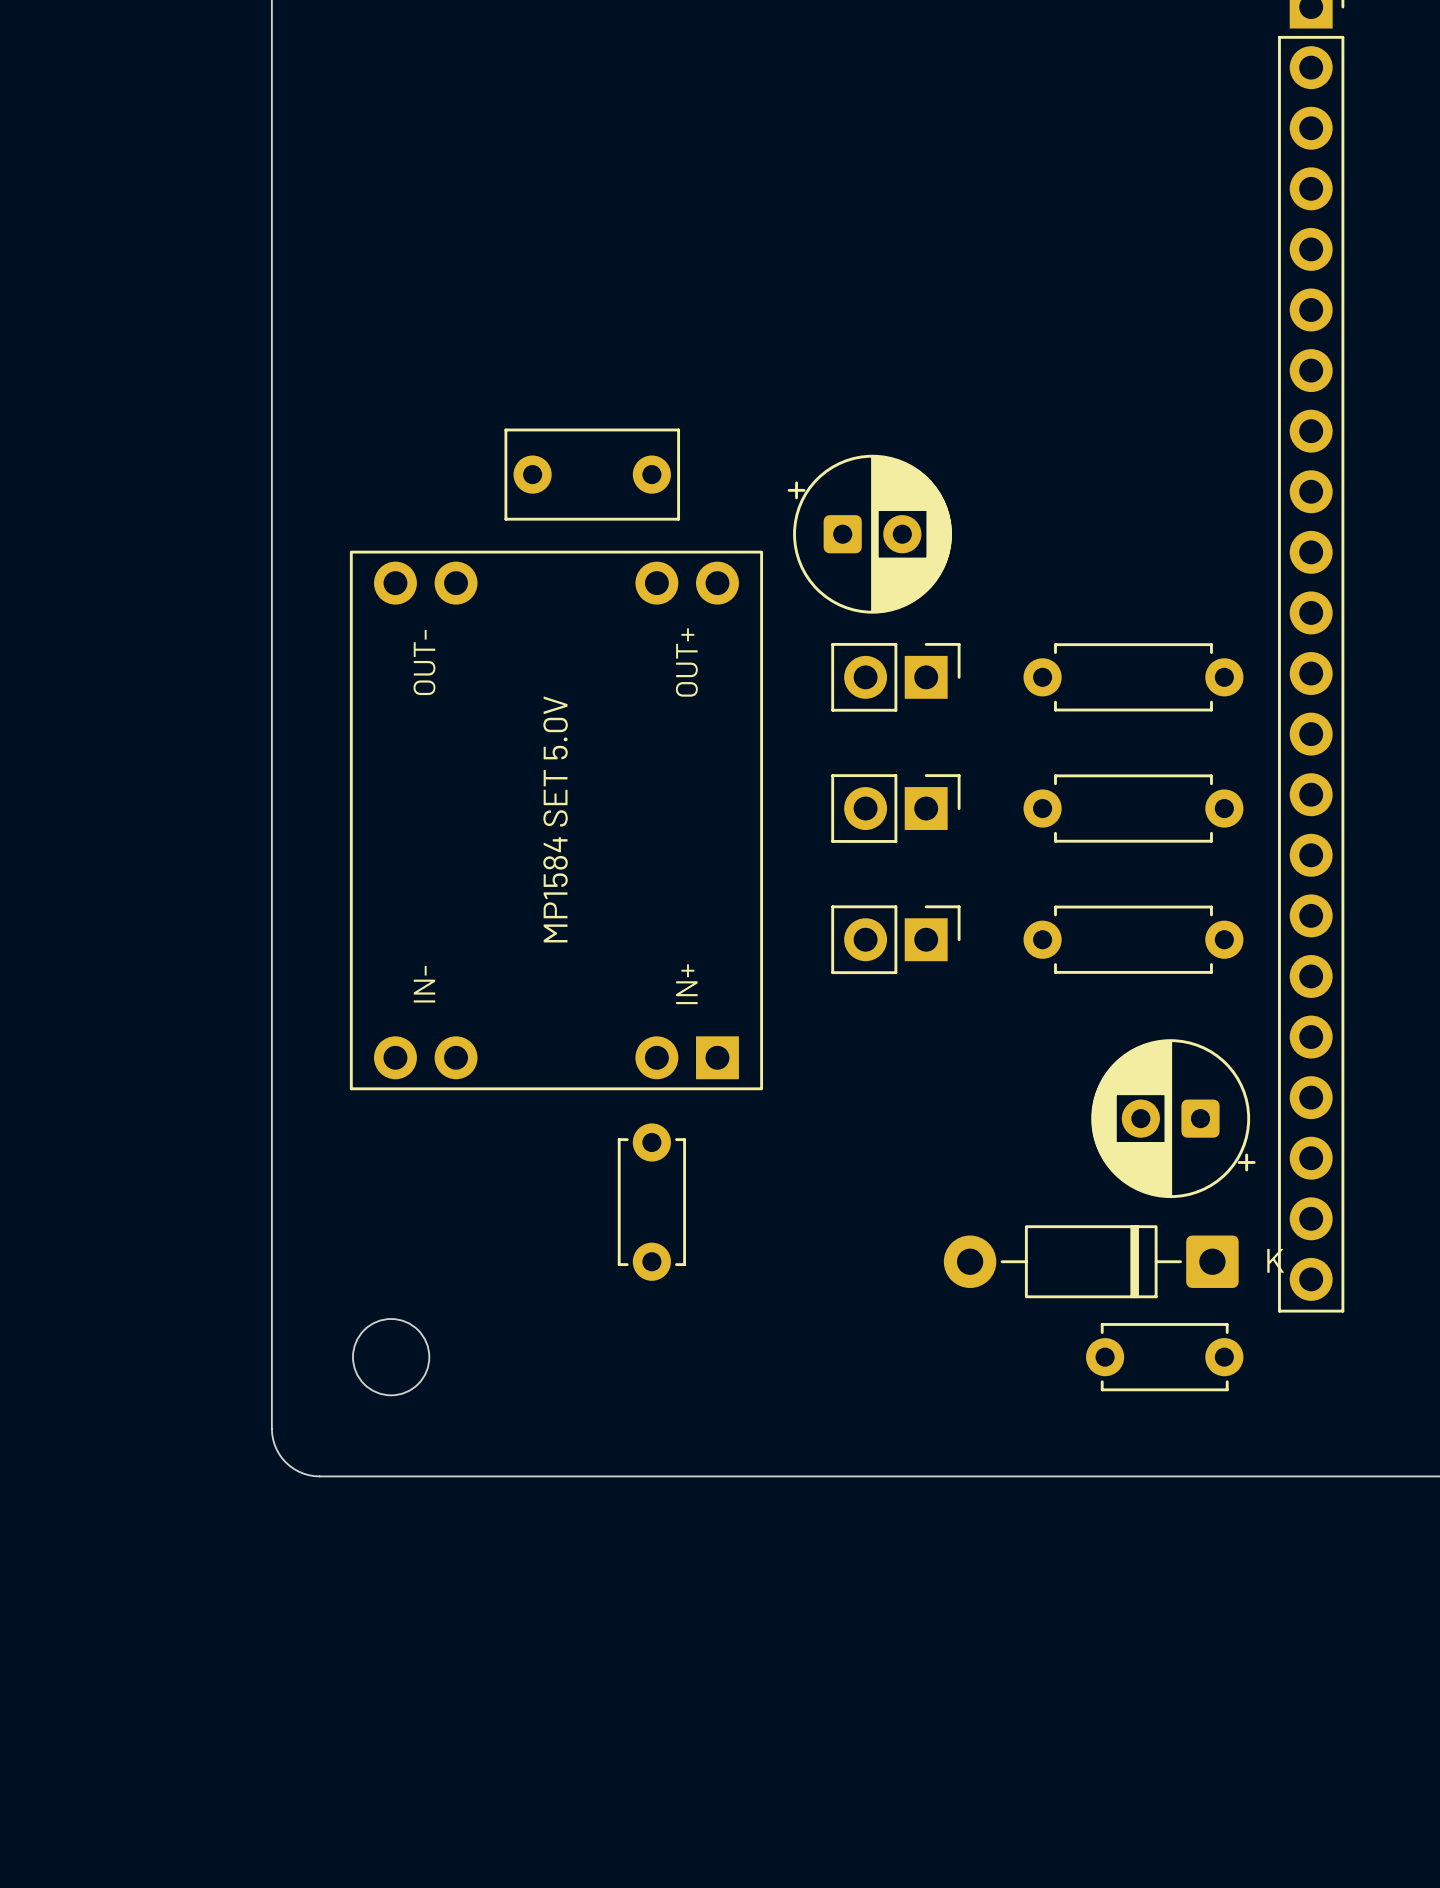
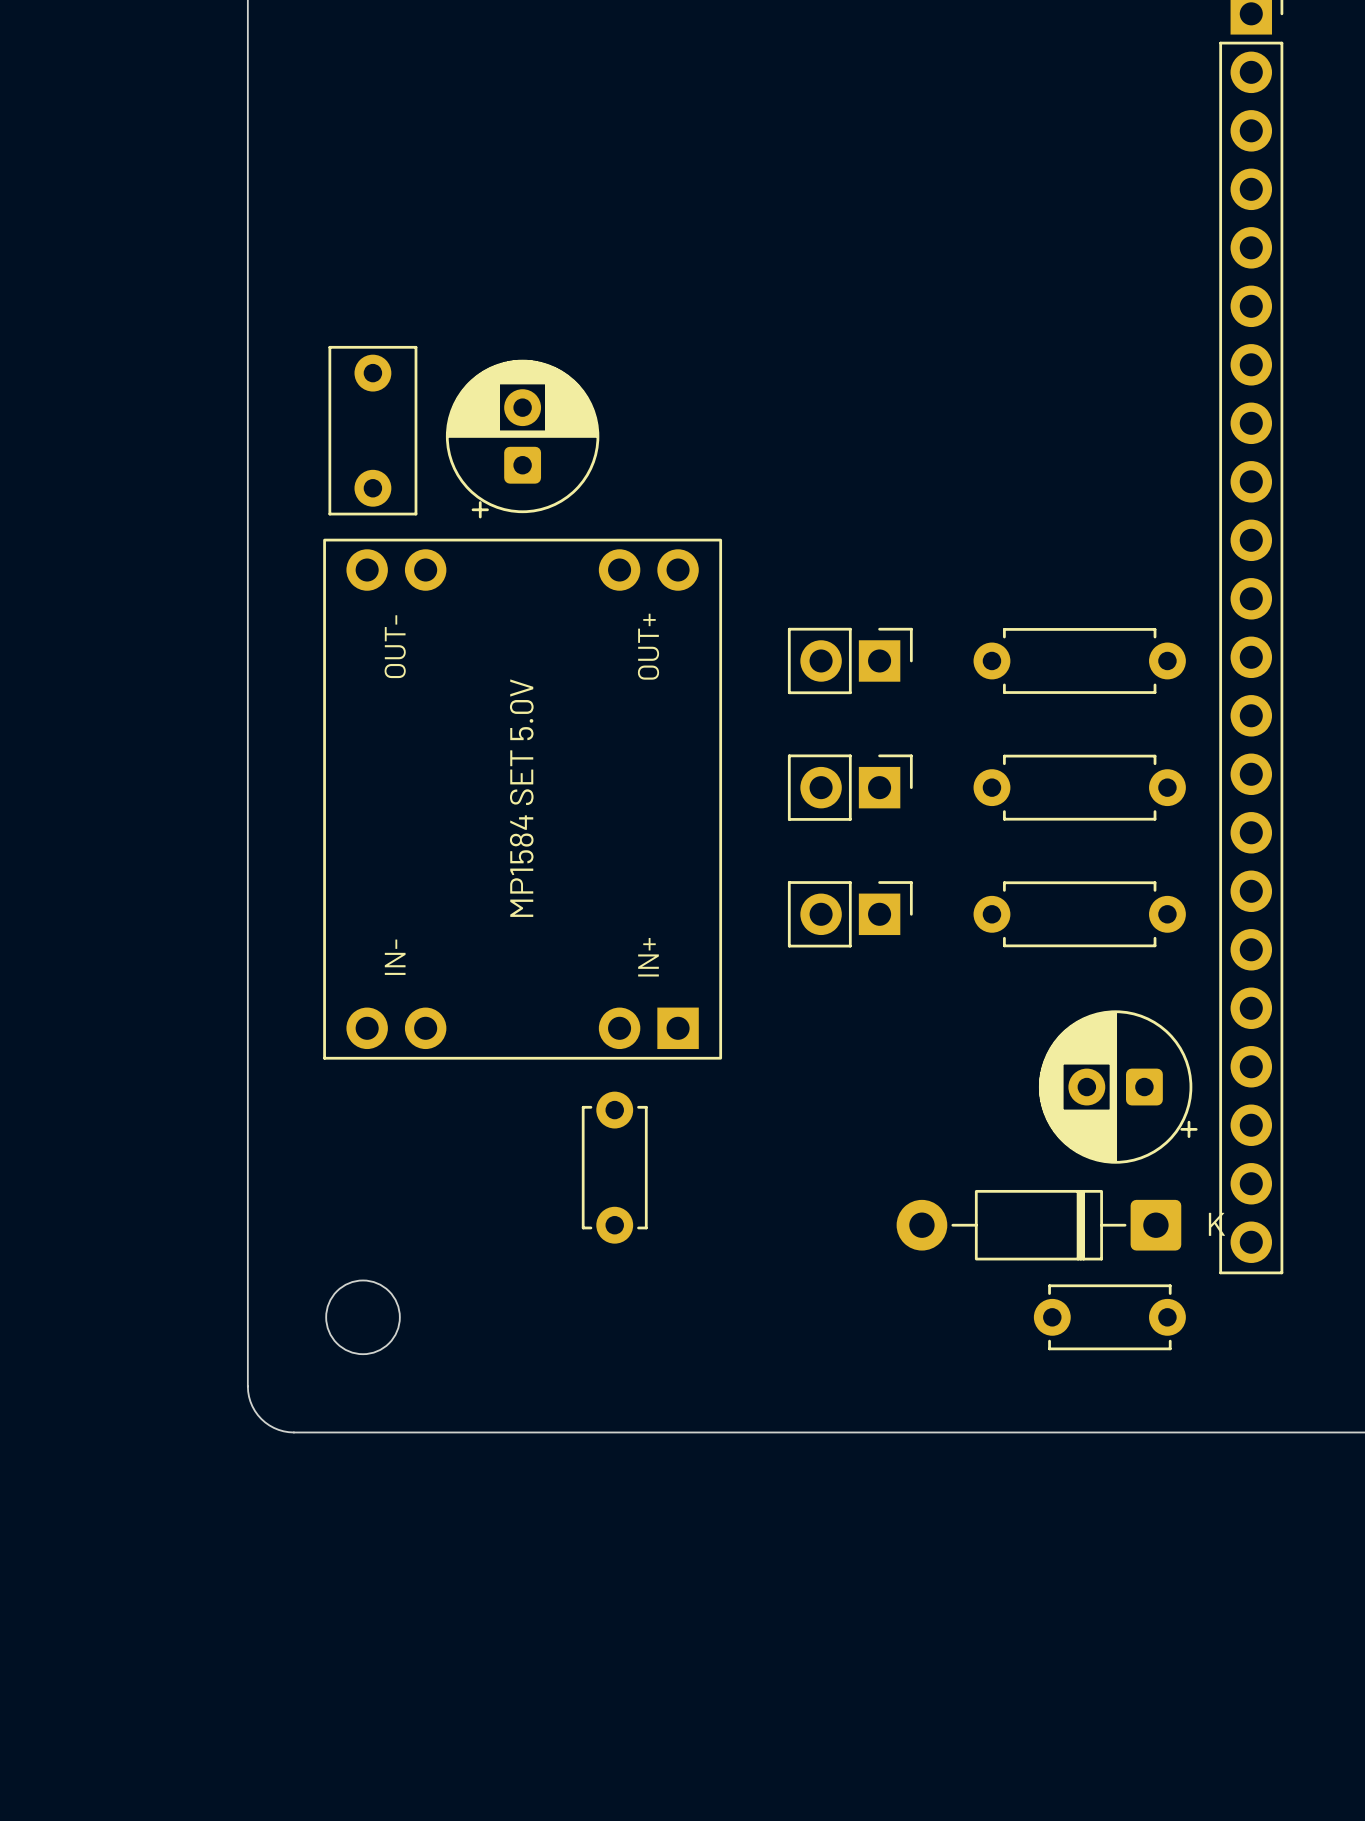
part rotation: 0° (592, 474) -> 90° clockwise (372, 430)
part position: (592, 474) -> (372, 430)
part rotation: 0° (869, 534) -> 90° counterclockwise (522, 439)
part position: (869, 534) -> (522, 439)

